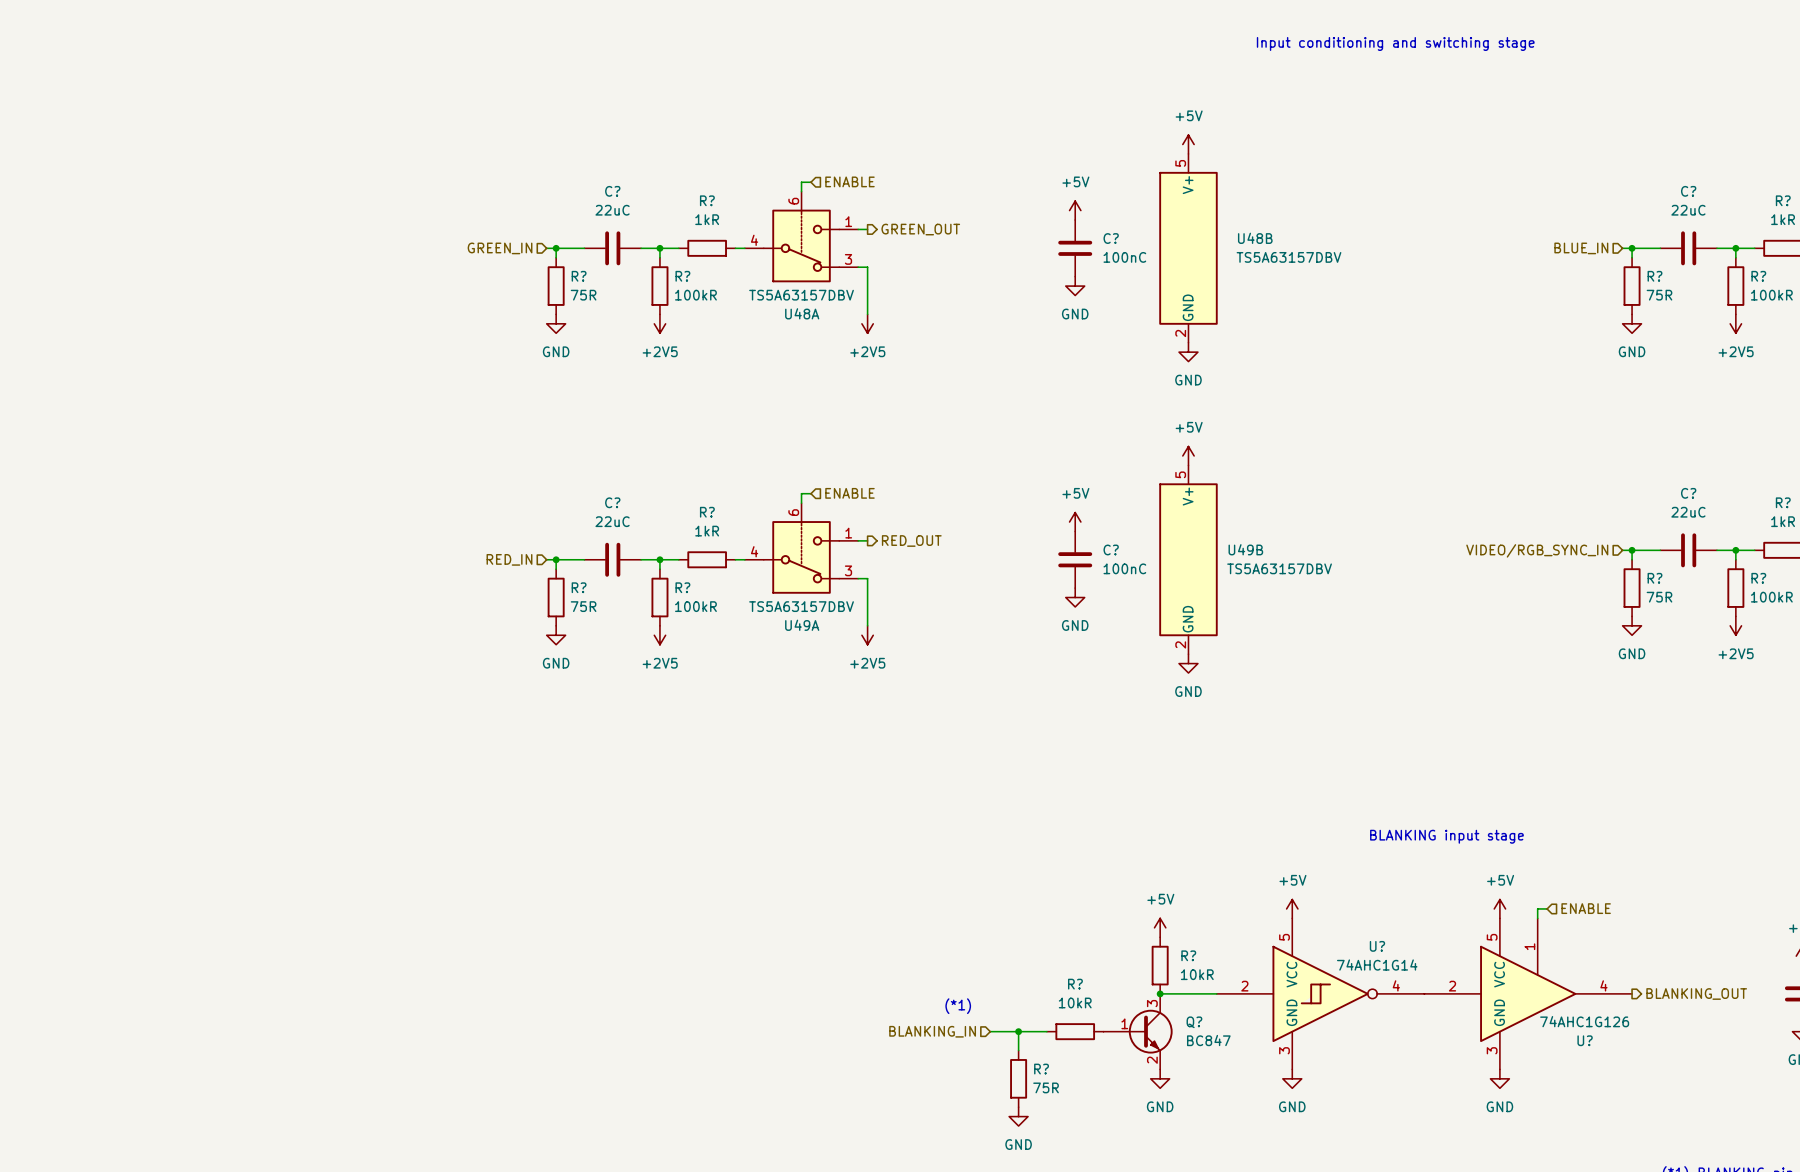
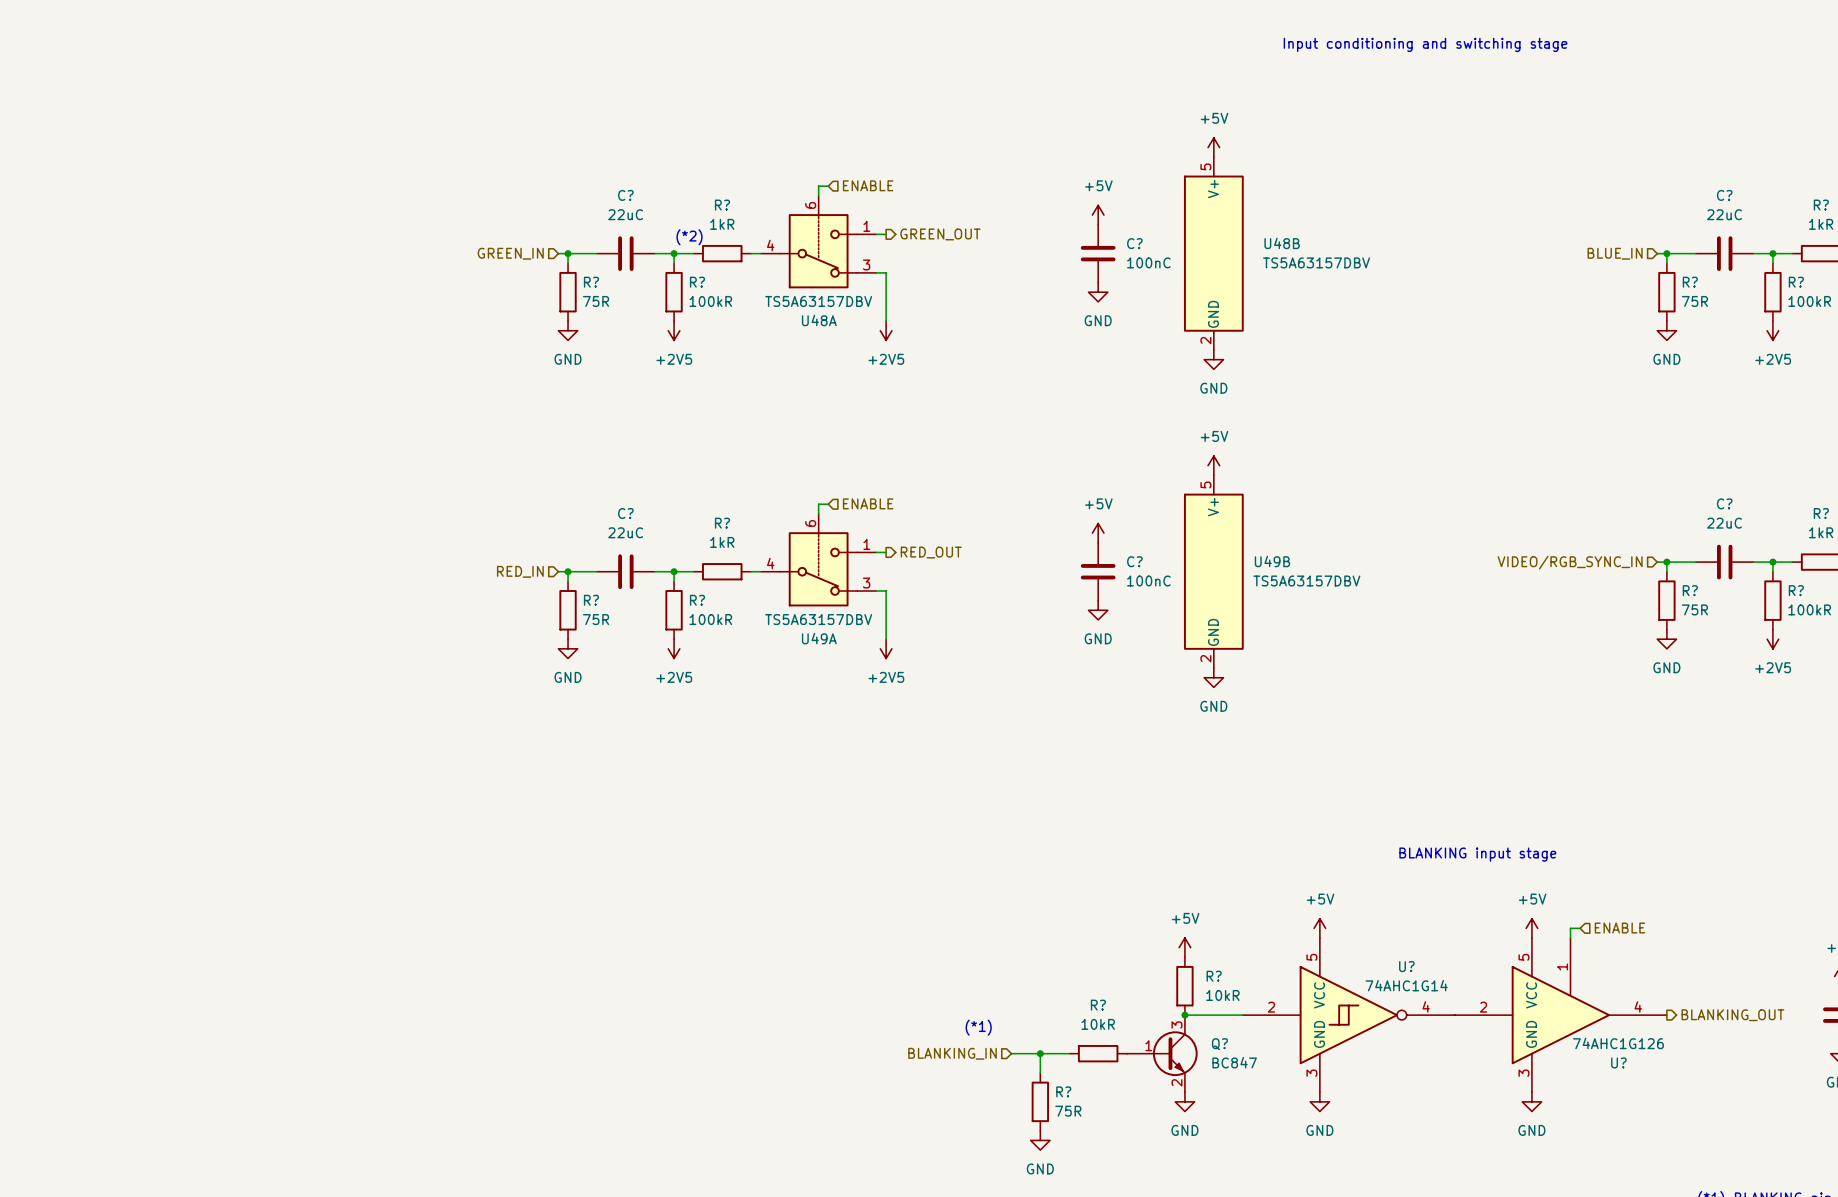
text: none -> (*2) (689, 237)

